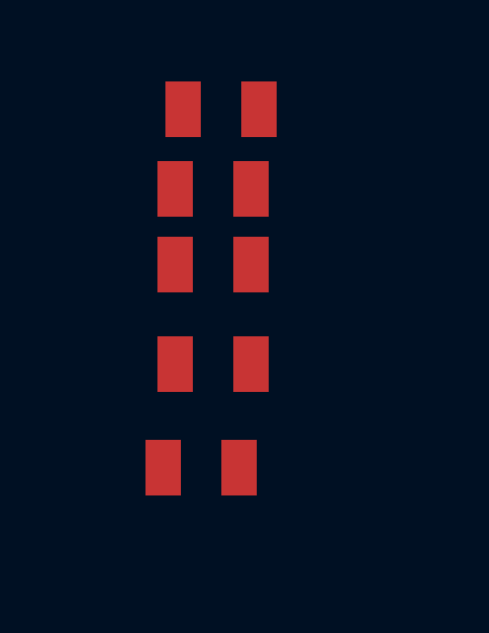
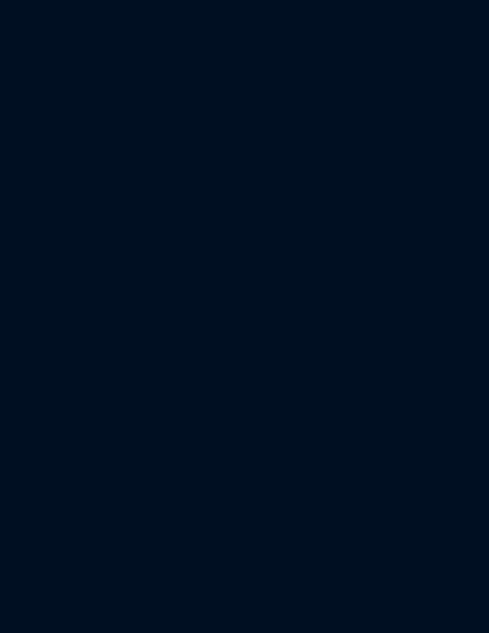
part: (221, 109) -> none
part: (213, 188) -> none
part: (213, 264) -> none
part: (213, 364) -> none
part: (201, 467) -> none

